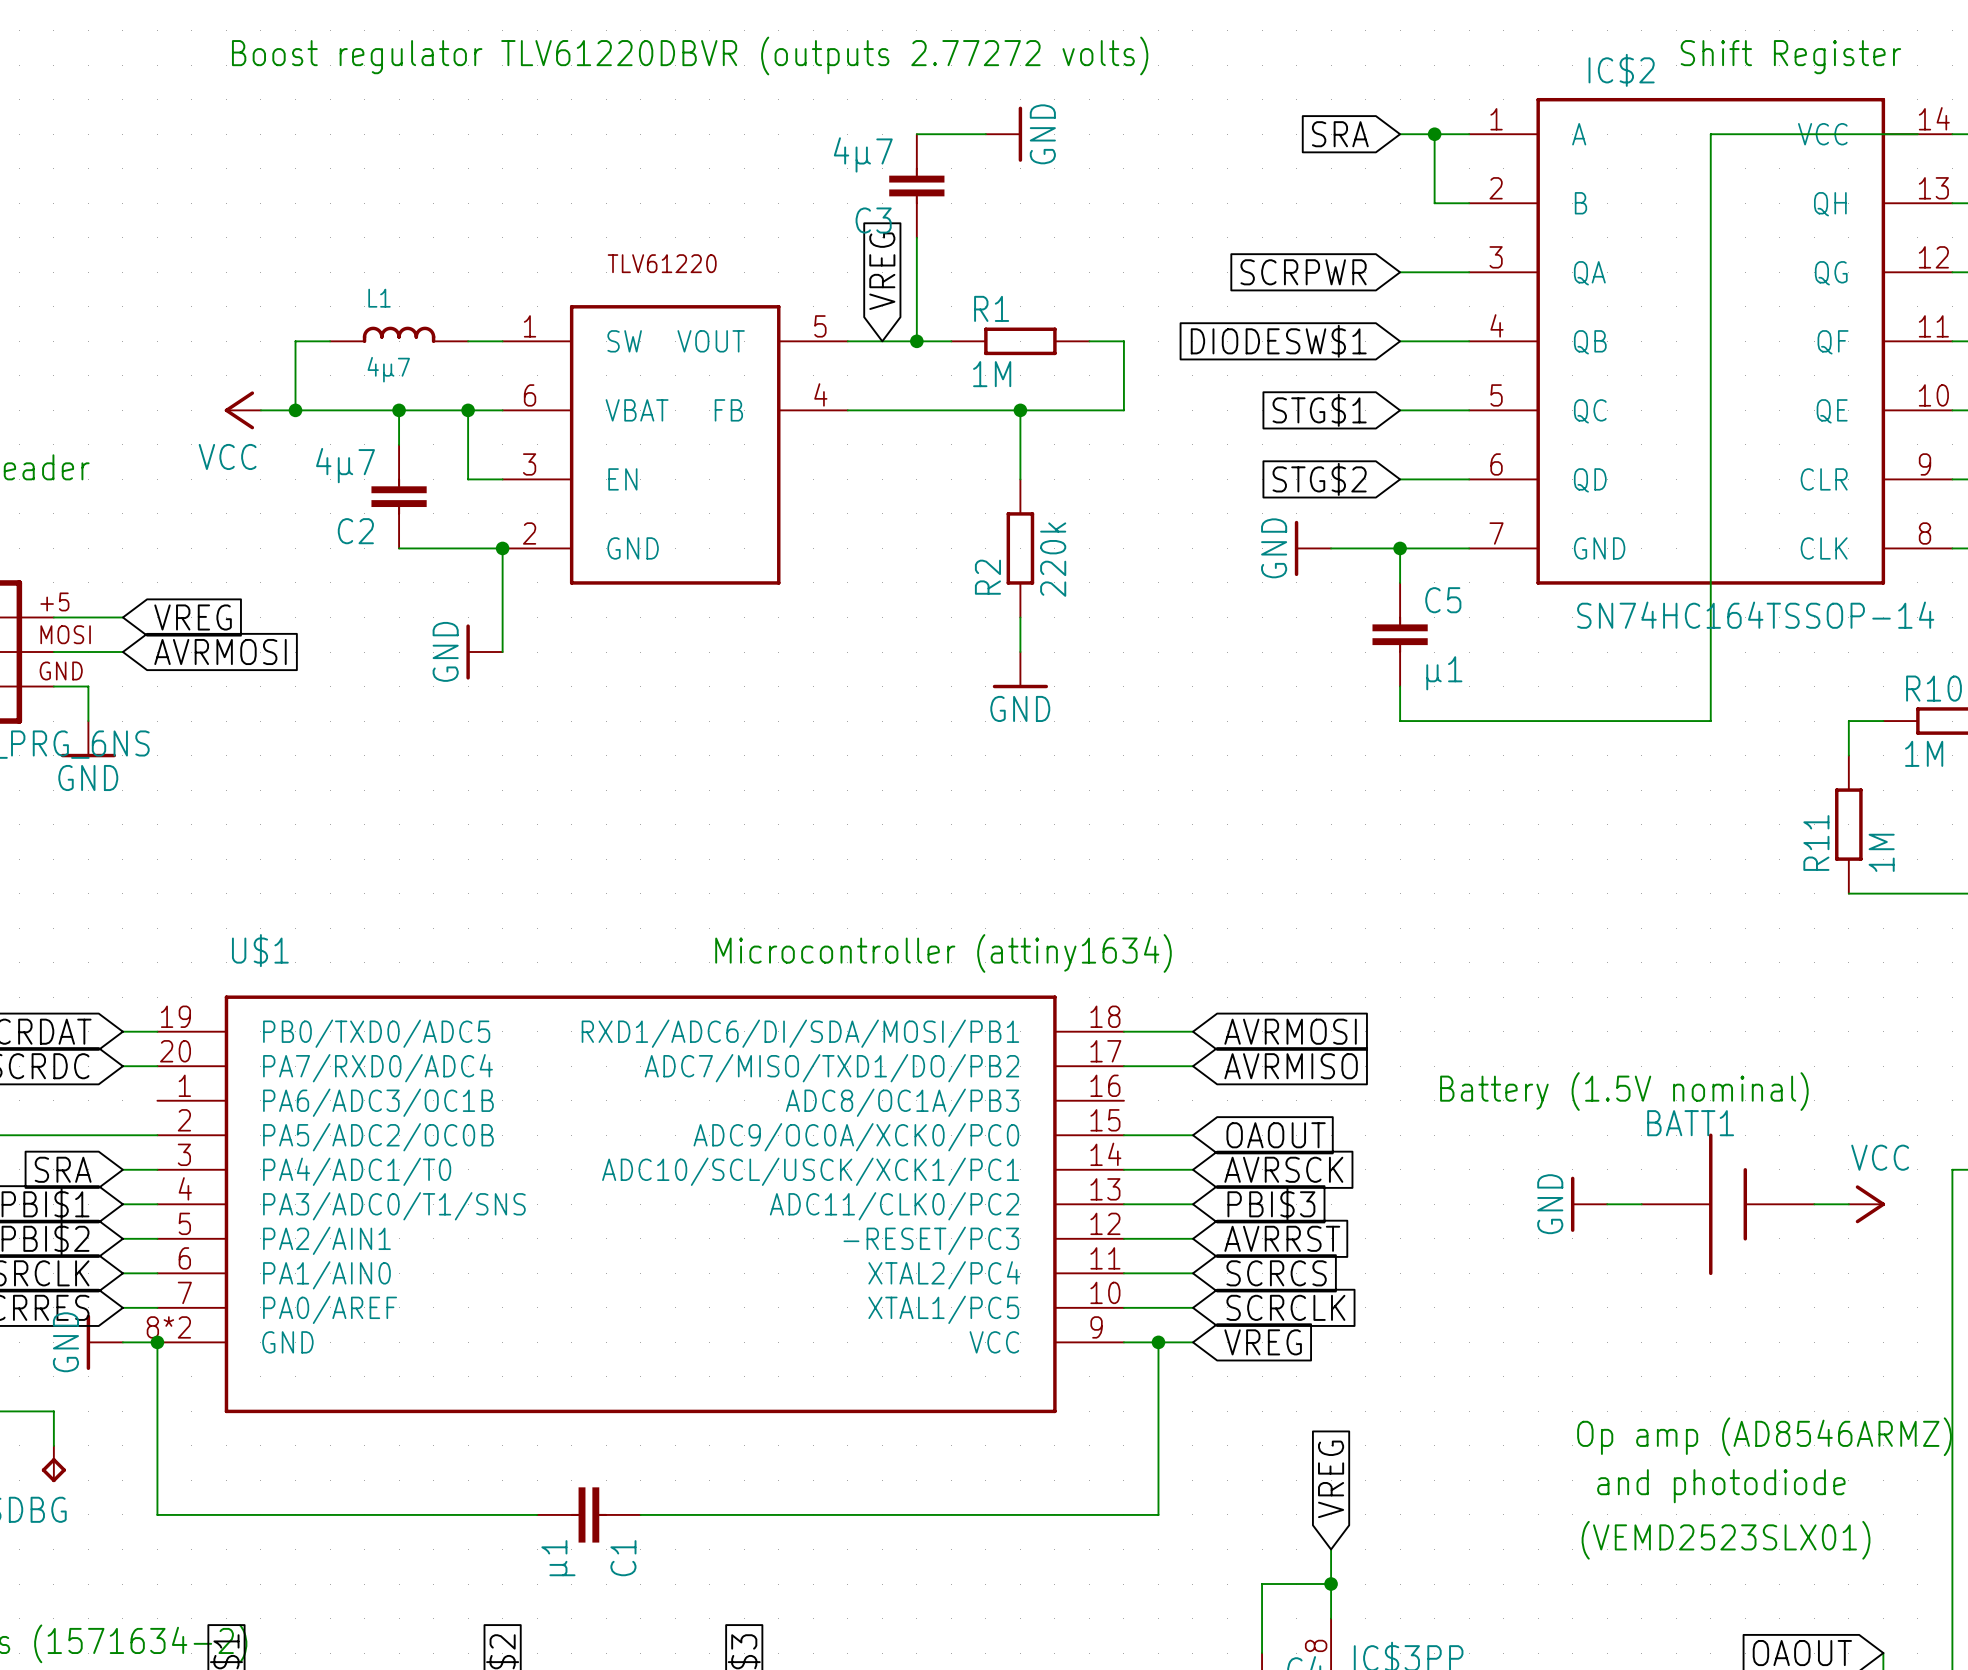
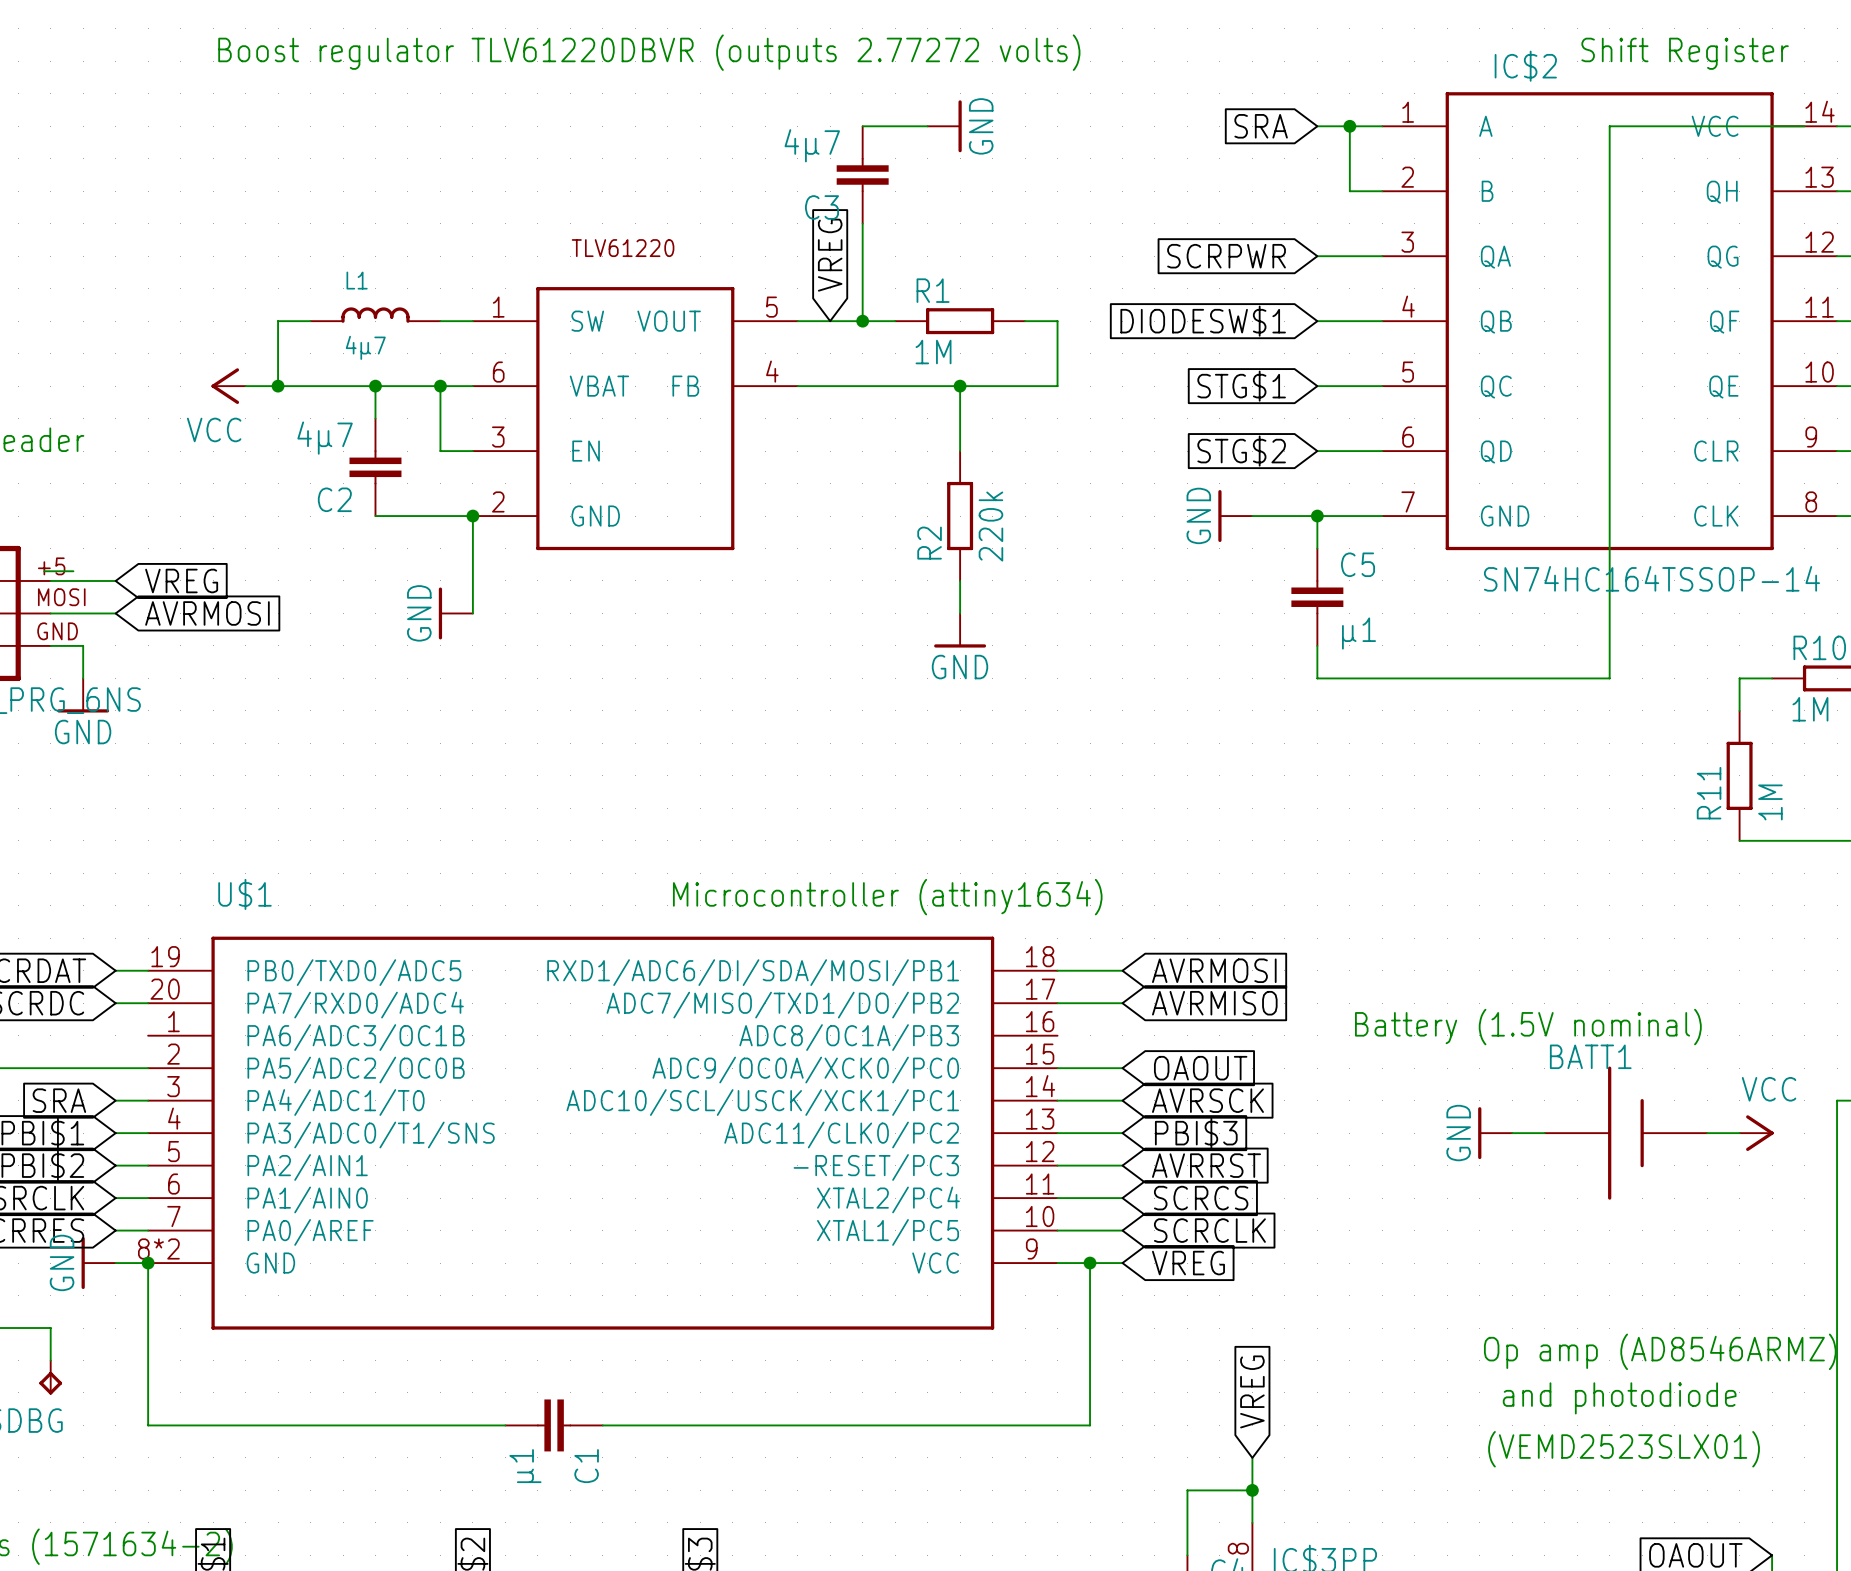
wire: none -> (44, 571) (73, 571)

